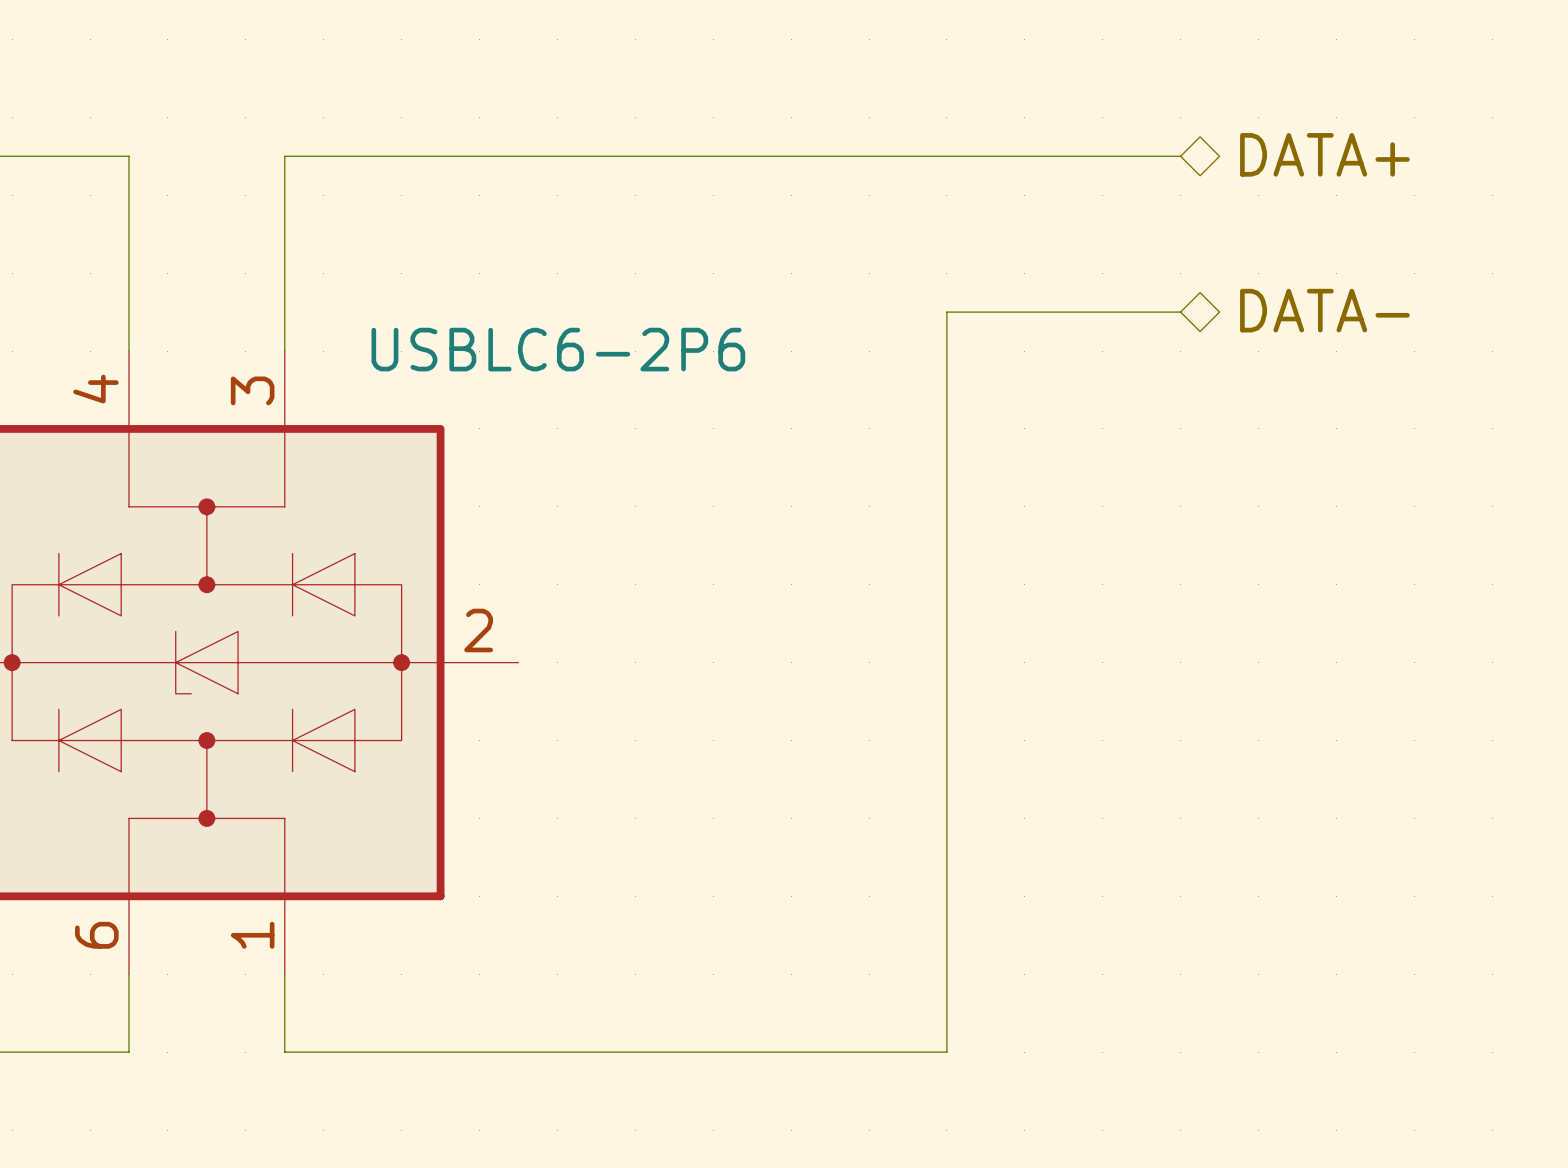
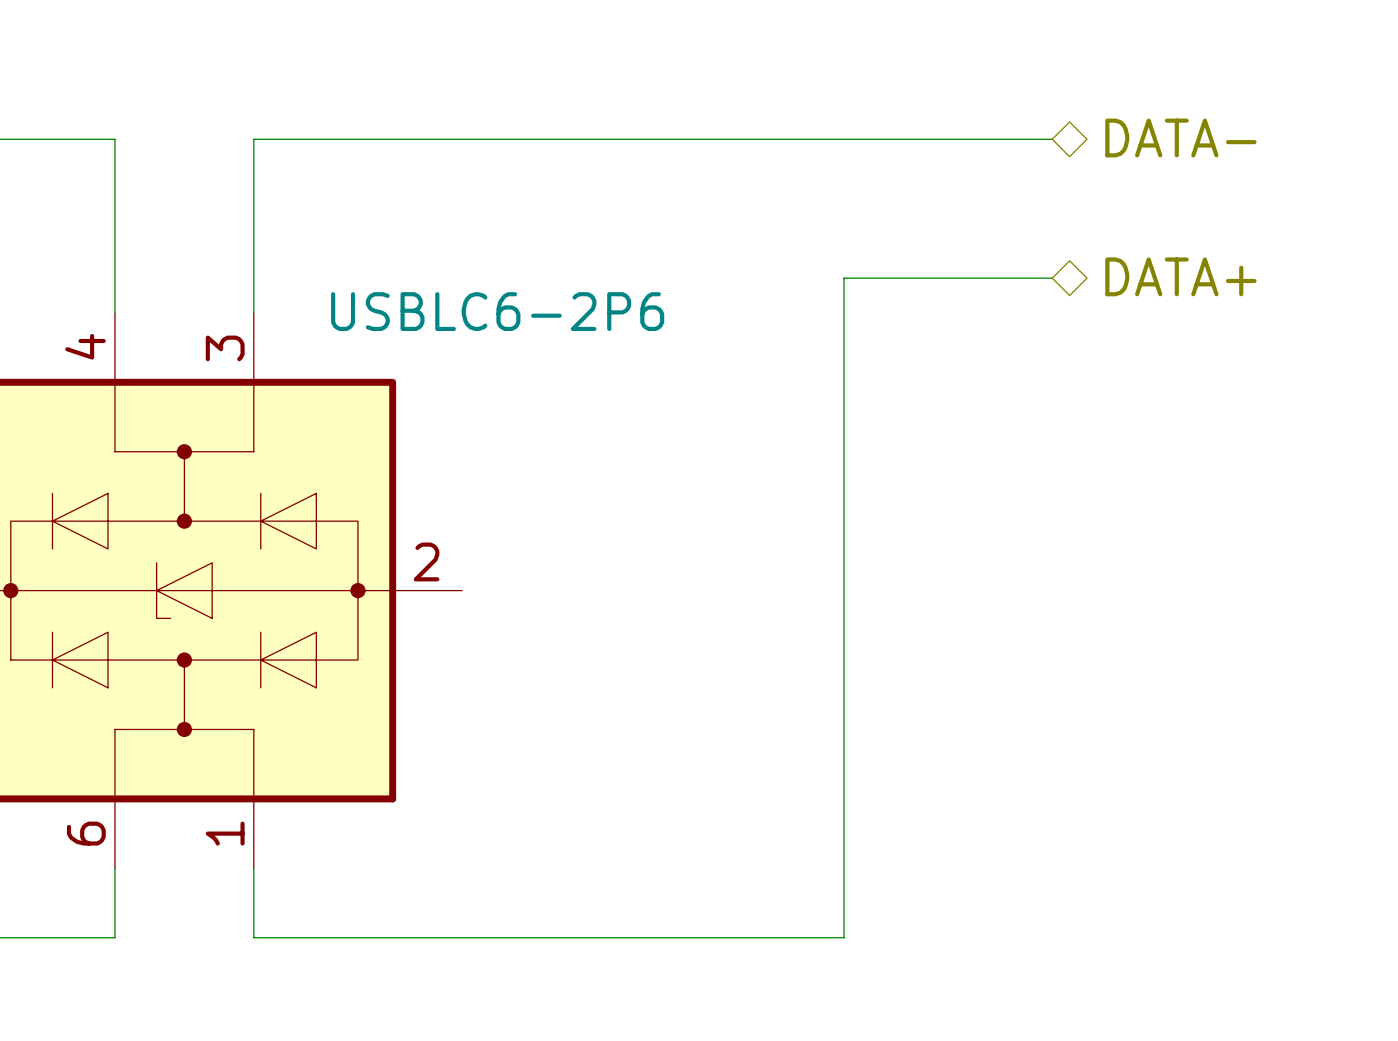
hierarchical label: DATA+ (1324, 154) -> DATA- (1180, 138)
hierarchical label: DATA- (1324, 310) -> DATA+ (1180, 276)

